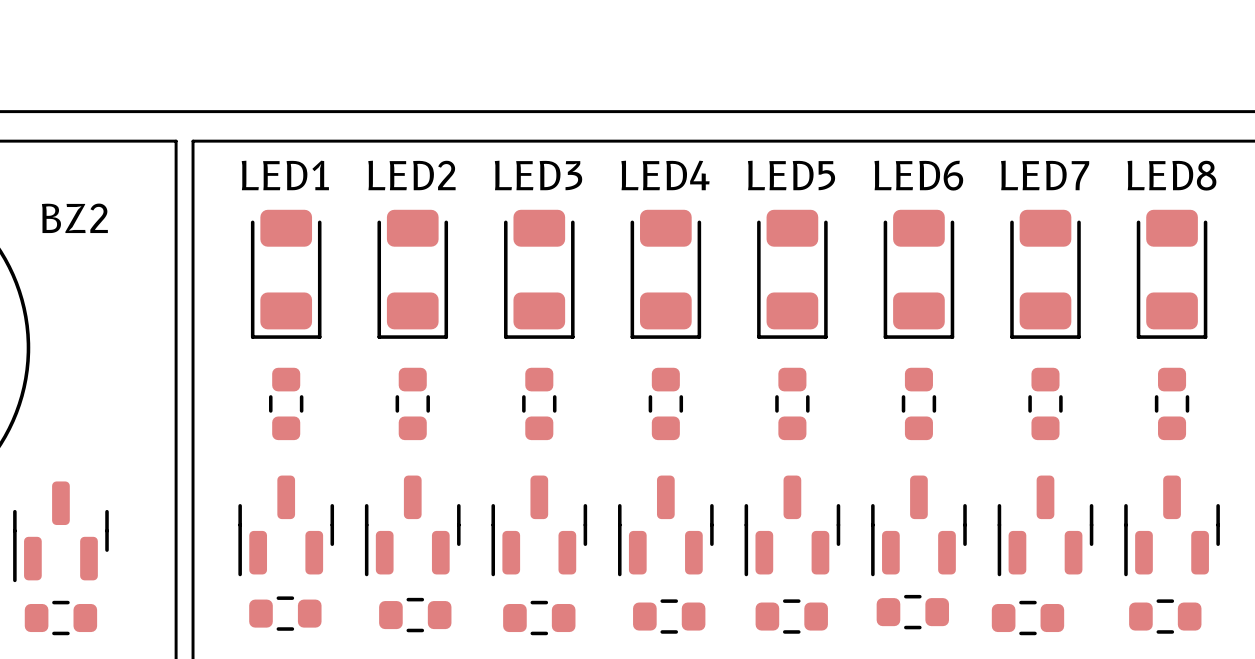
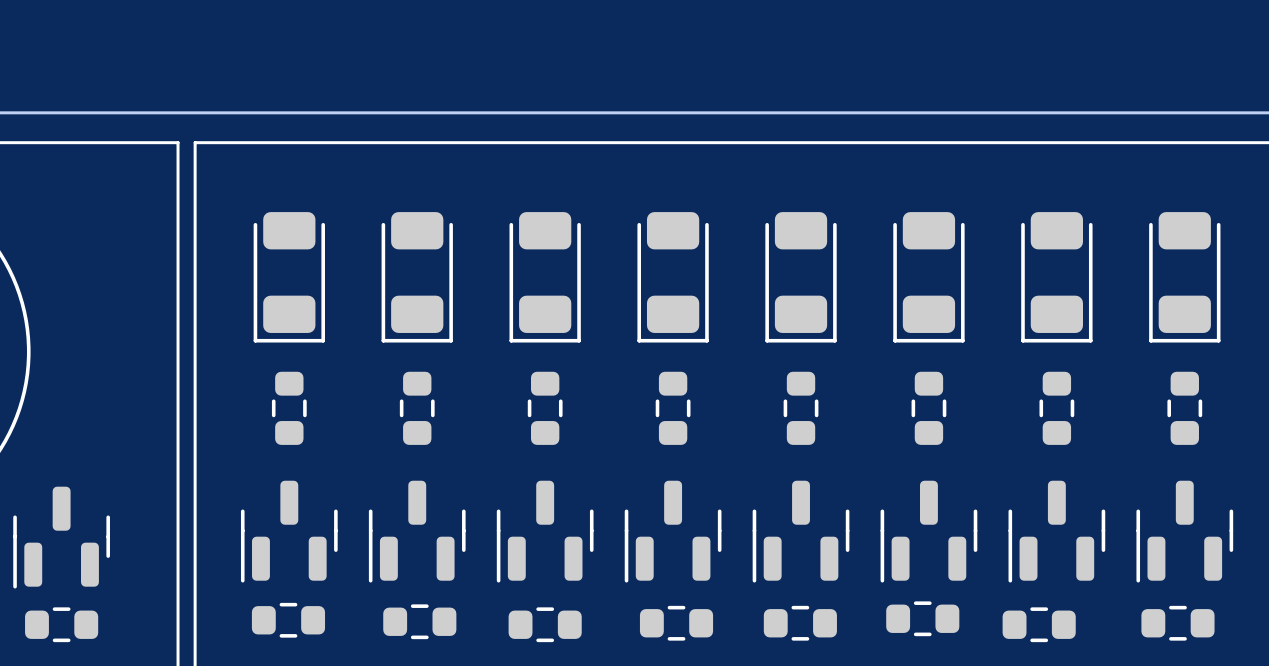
LED1 name: LED1 (285, 175) -> none
LED2 name: LED2 (411, 175) -> none
LED3 name: LED3 (538, 175) -> none
LED4 name: LED4 (665, 175) -> none
LED5 name: LED5 (791, 175) -> none
LED6 name: LED6 (918, 175) -> none
LED7 name: LED7 (1045, 175) -> none
LED8 name: LED8 (1171, 175) -> none
BZ2 name: BZ2 (74, 218) -> none

